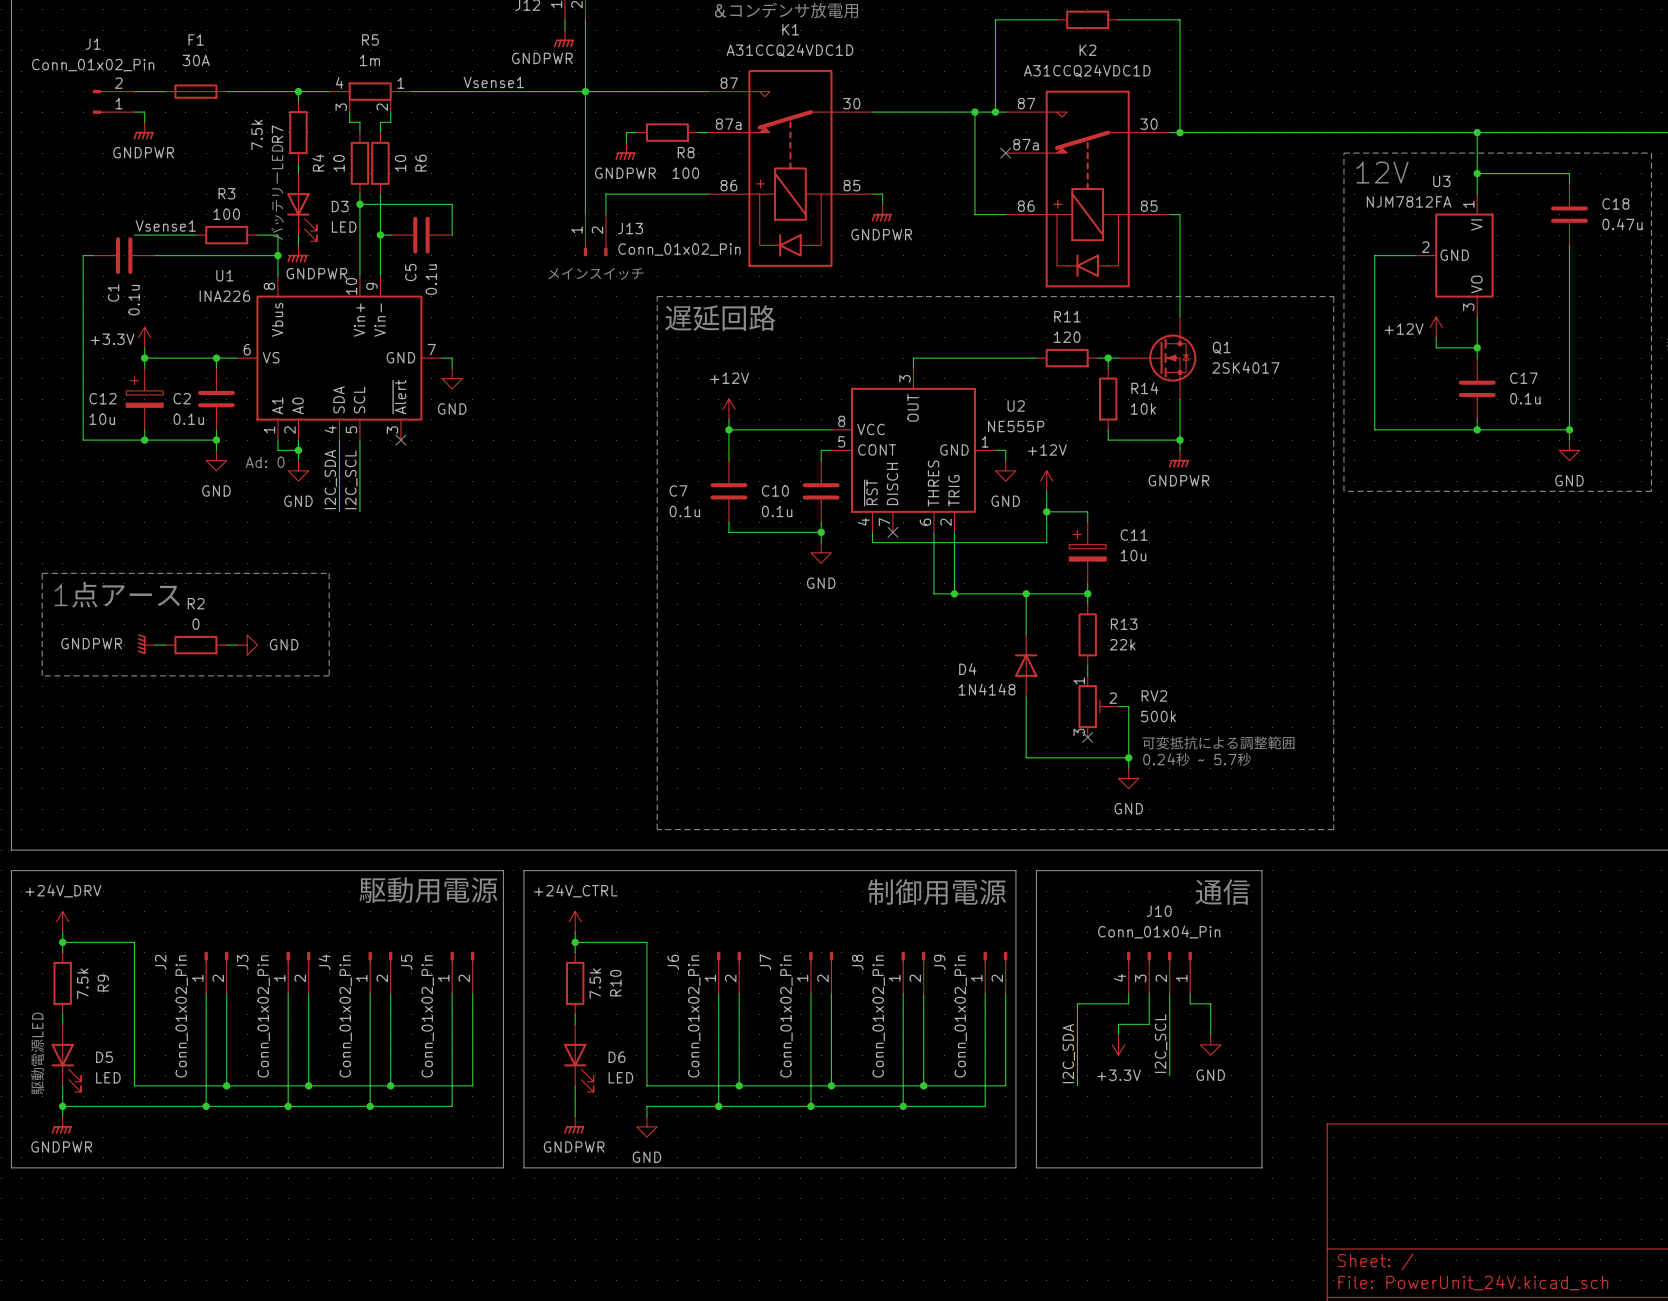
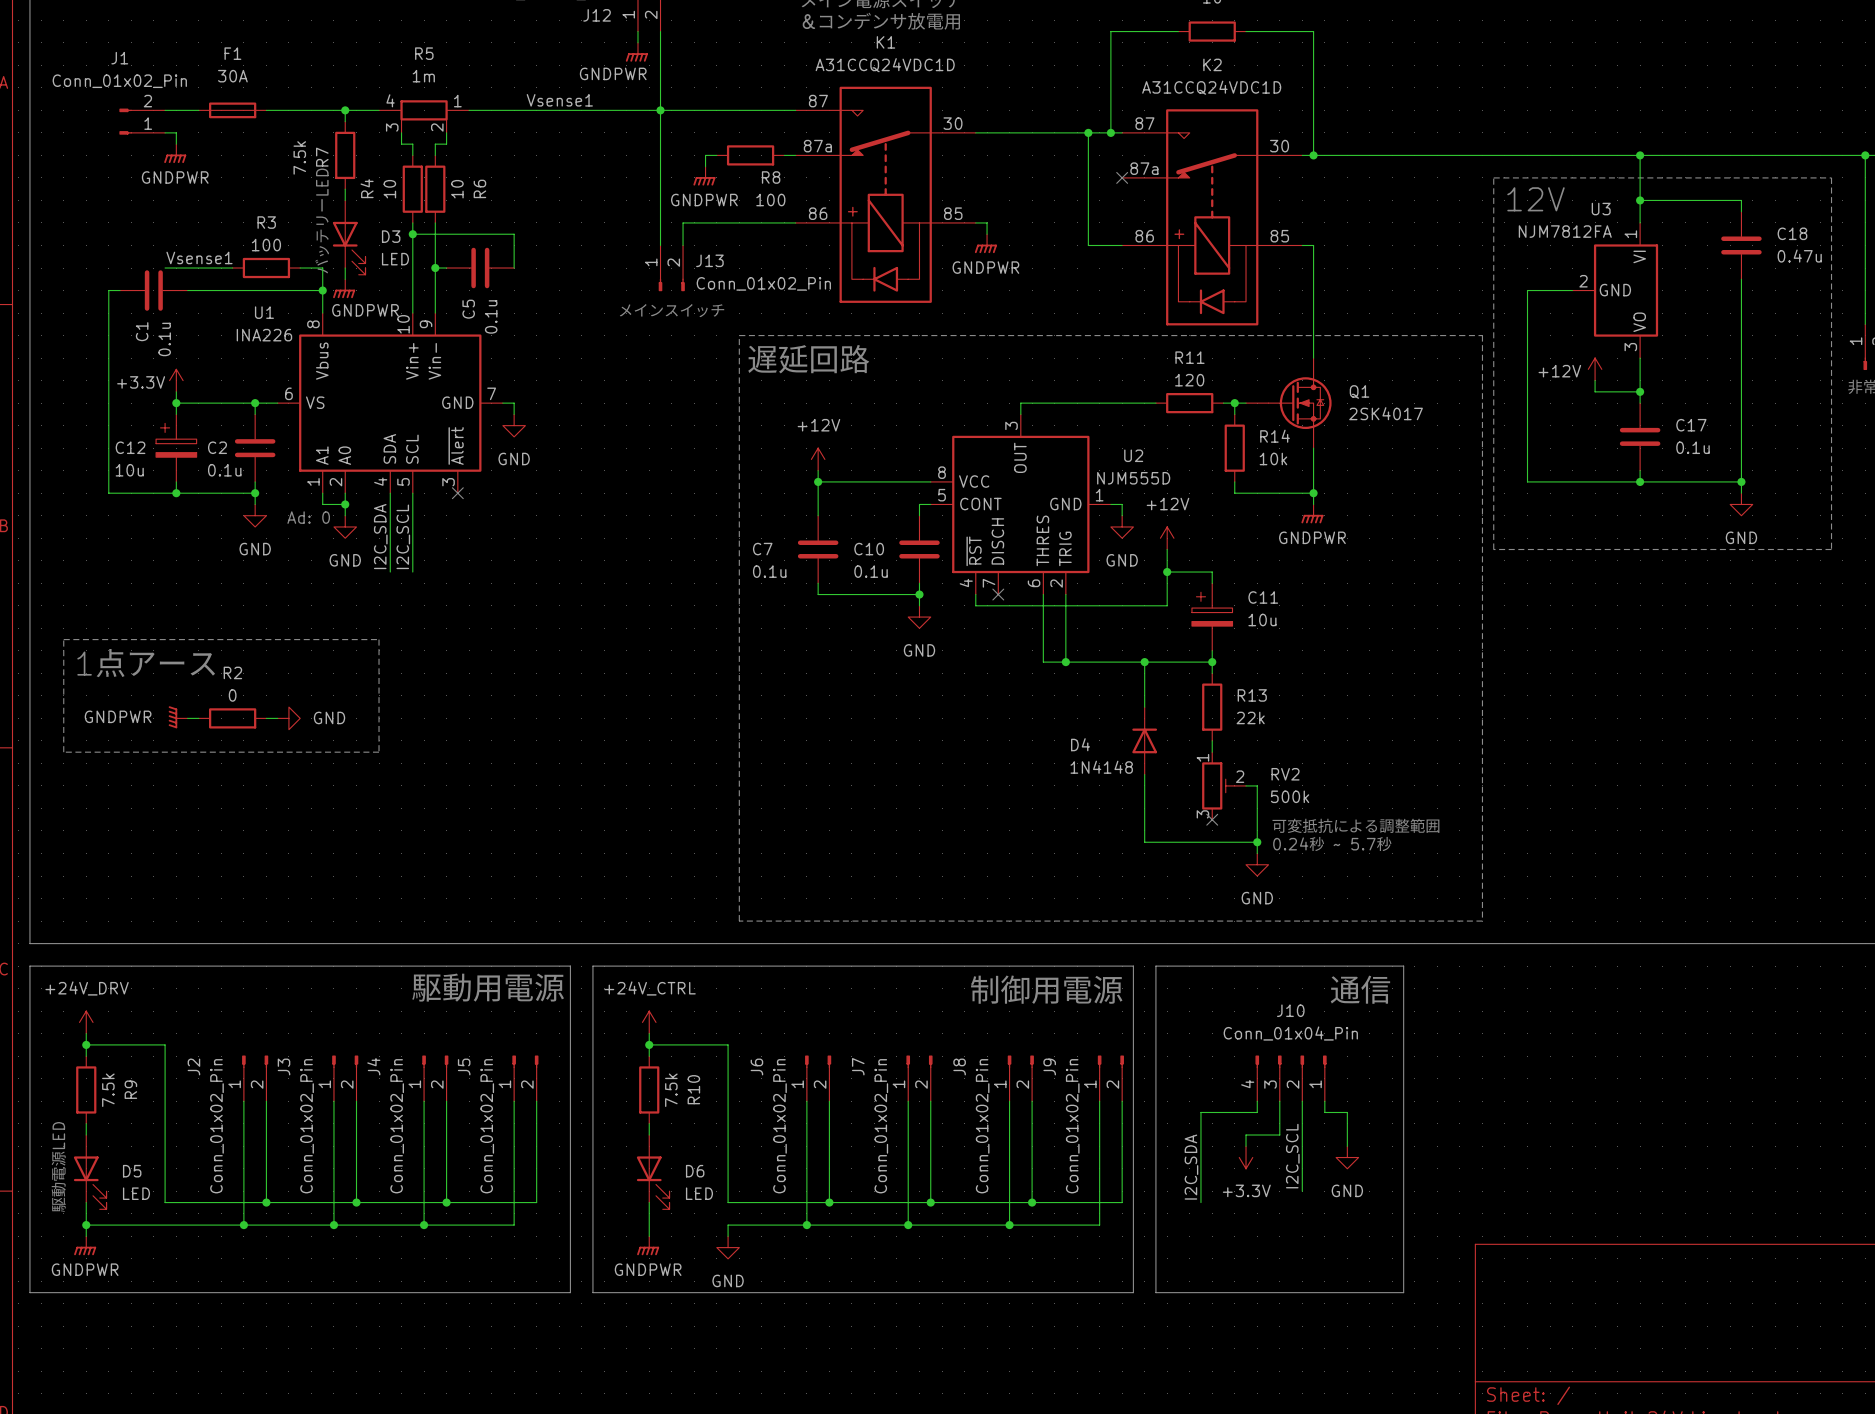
U2 value: NE555P (1016, 426) -> NJM555D (1133, 478)

